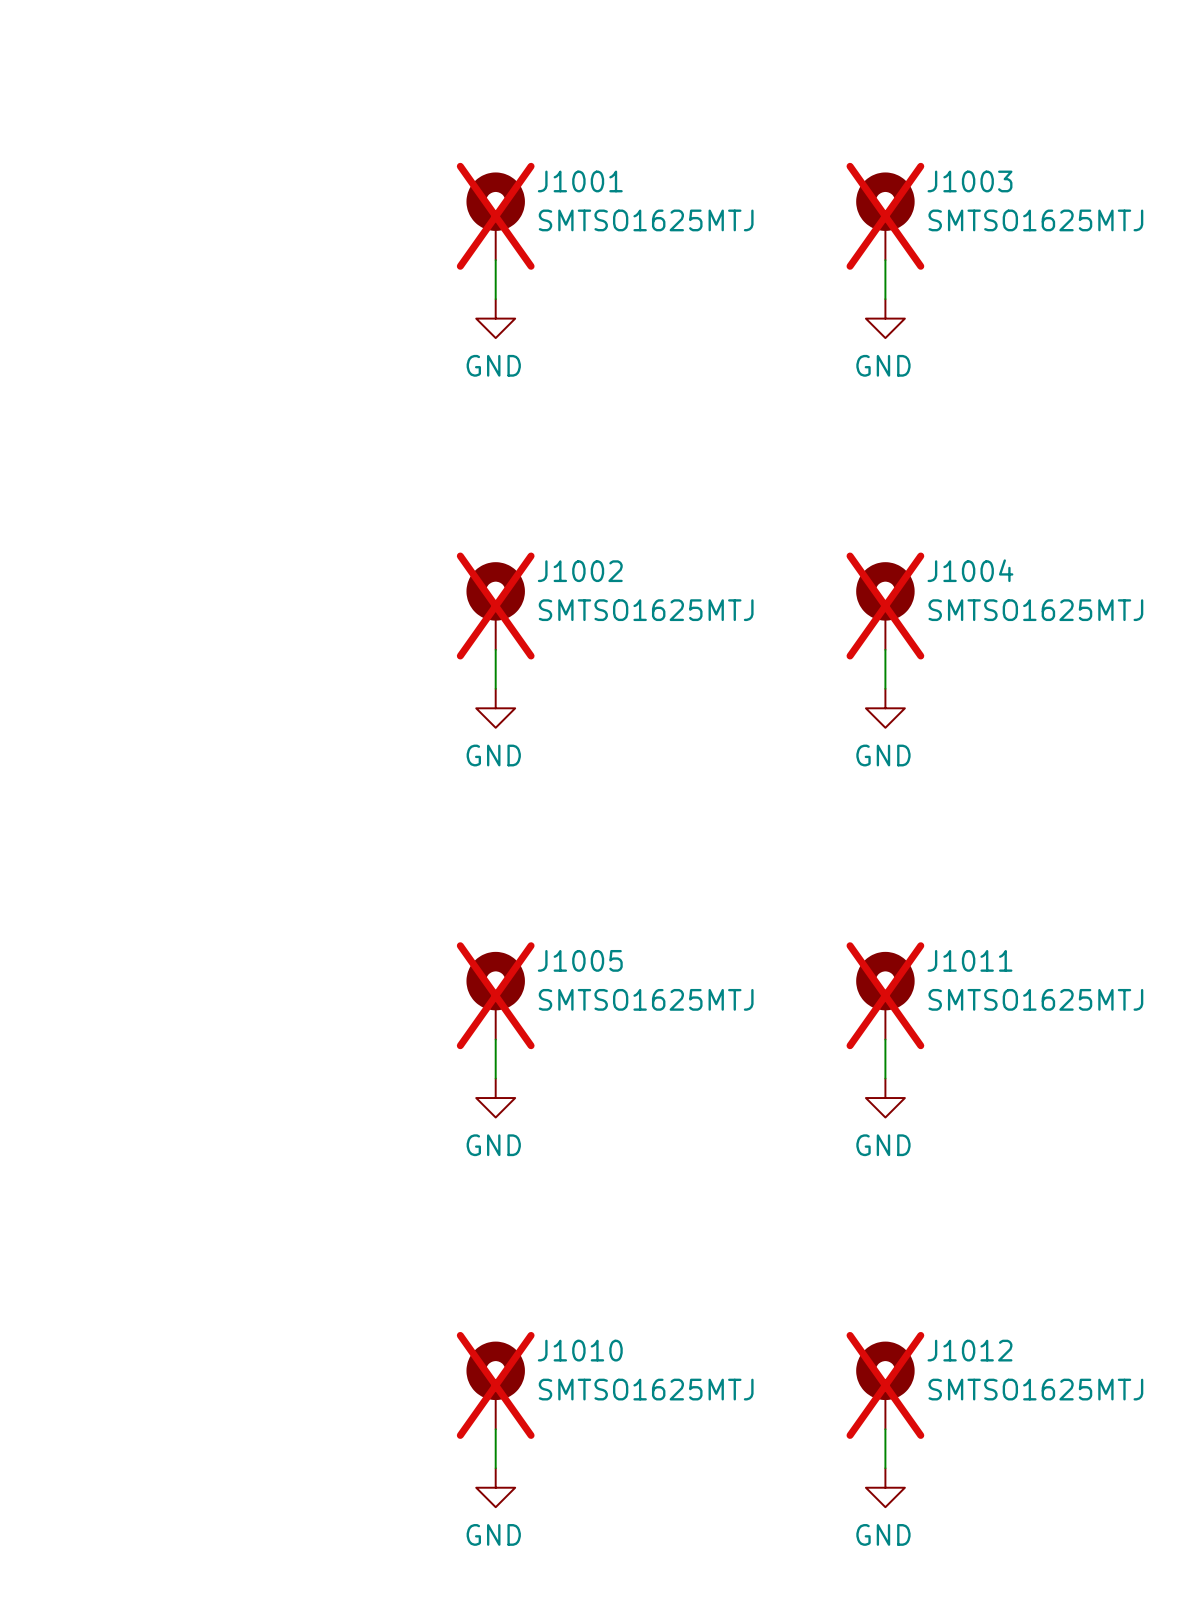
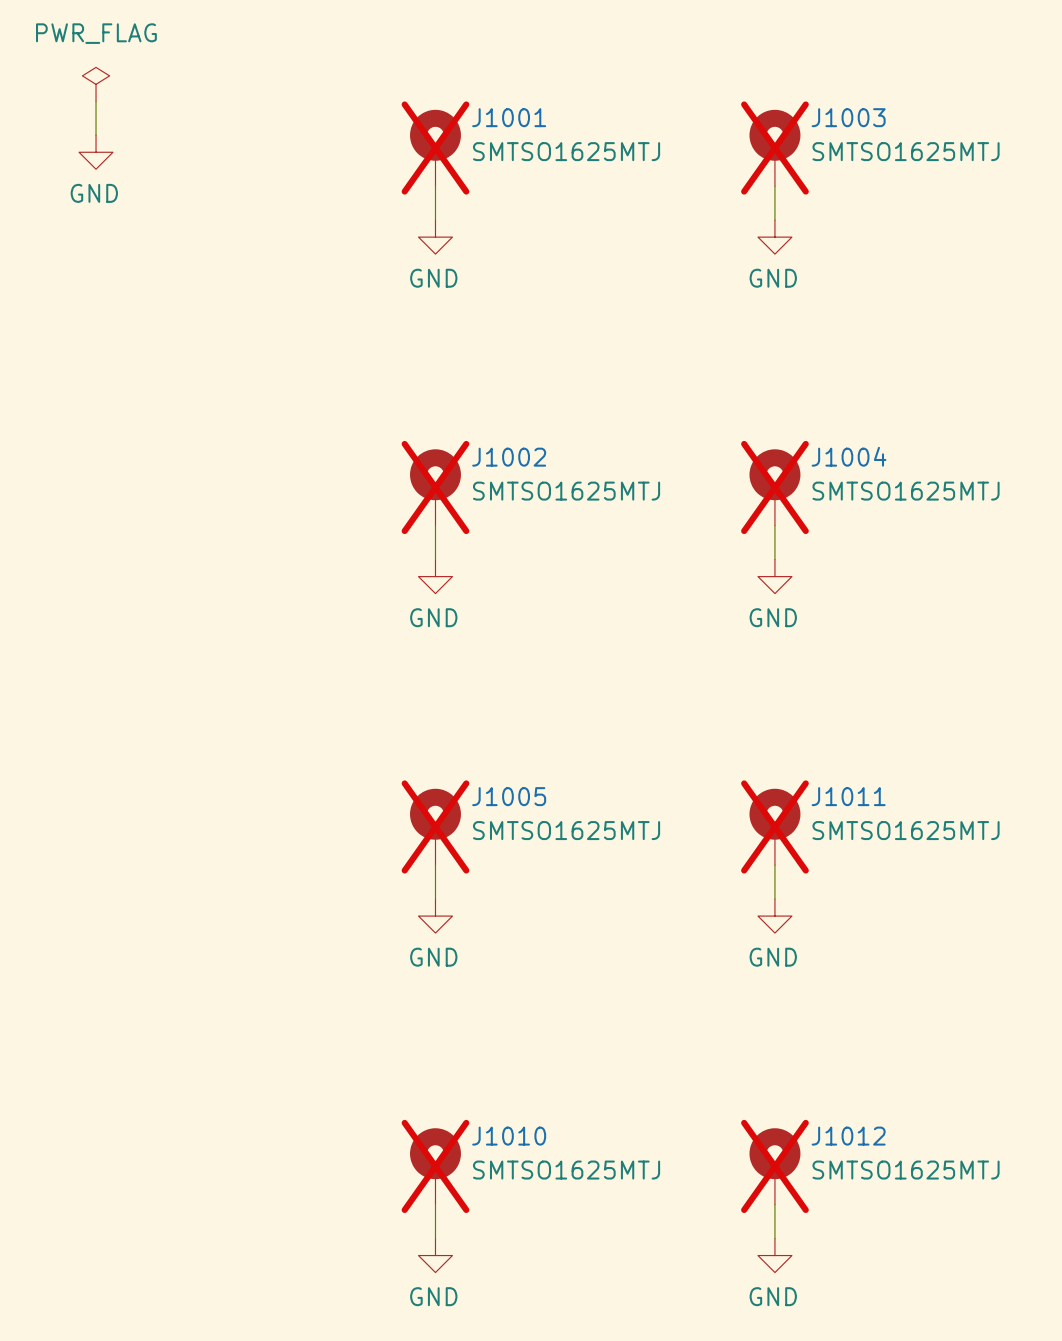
power symbol: none -> PWR_FLAG (96, 84)
wire: none -> (96, 101) (96, 135)
power symbol: none -> GND (96, 152)

